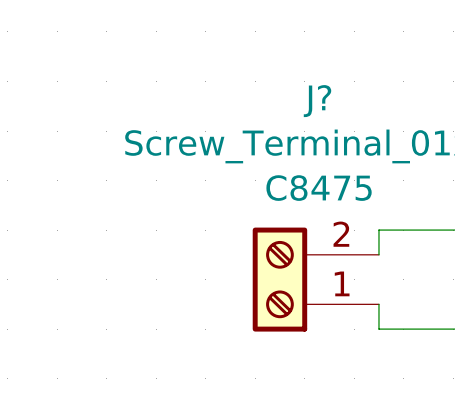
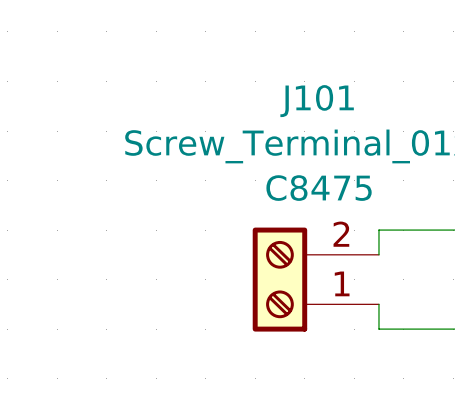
J? name: J? (317, 101) -> J101 (317, 101)

